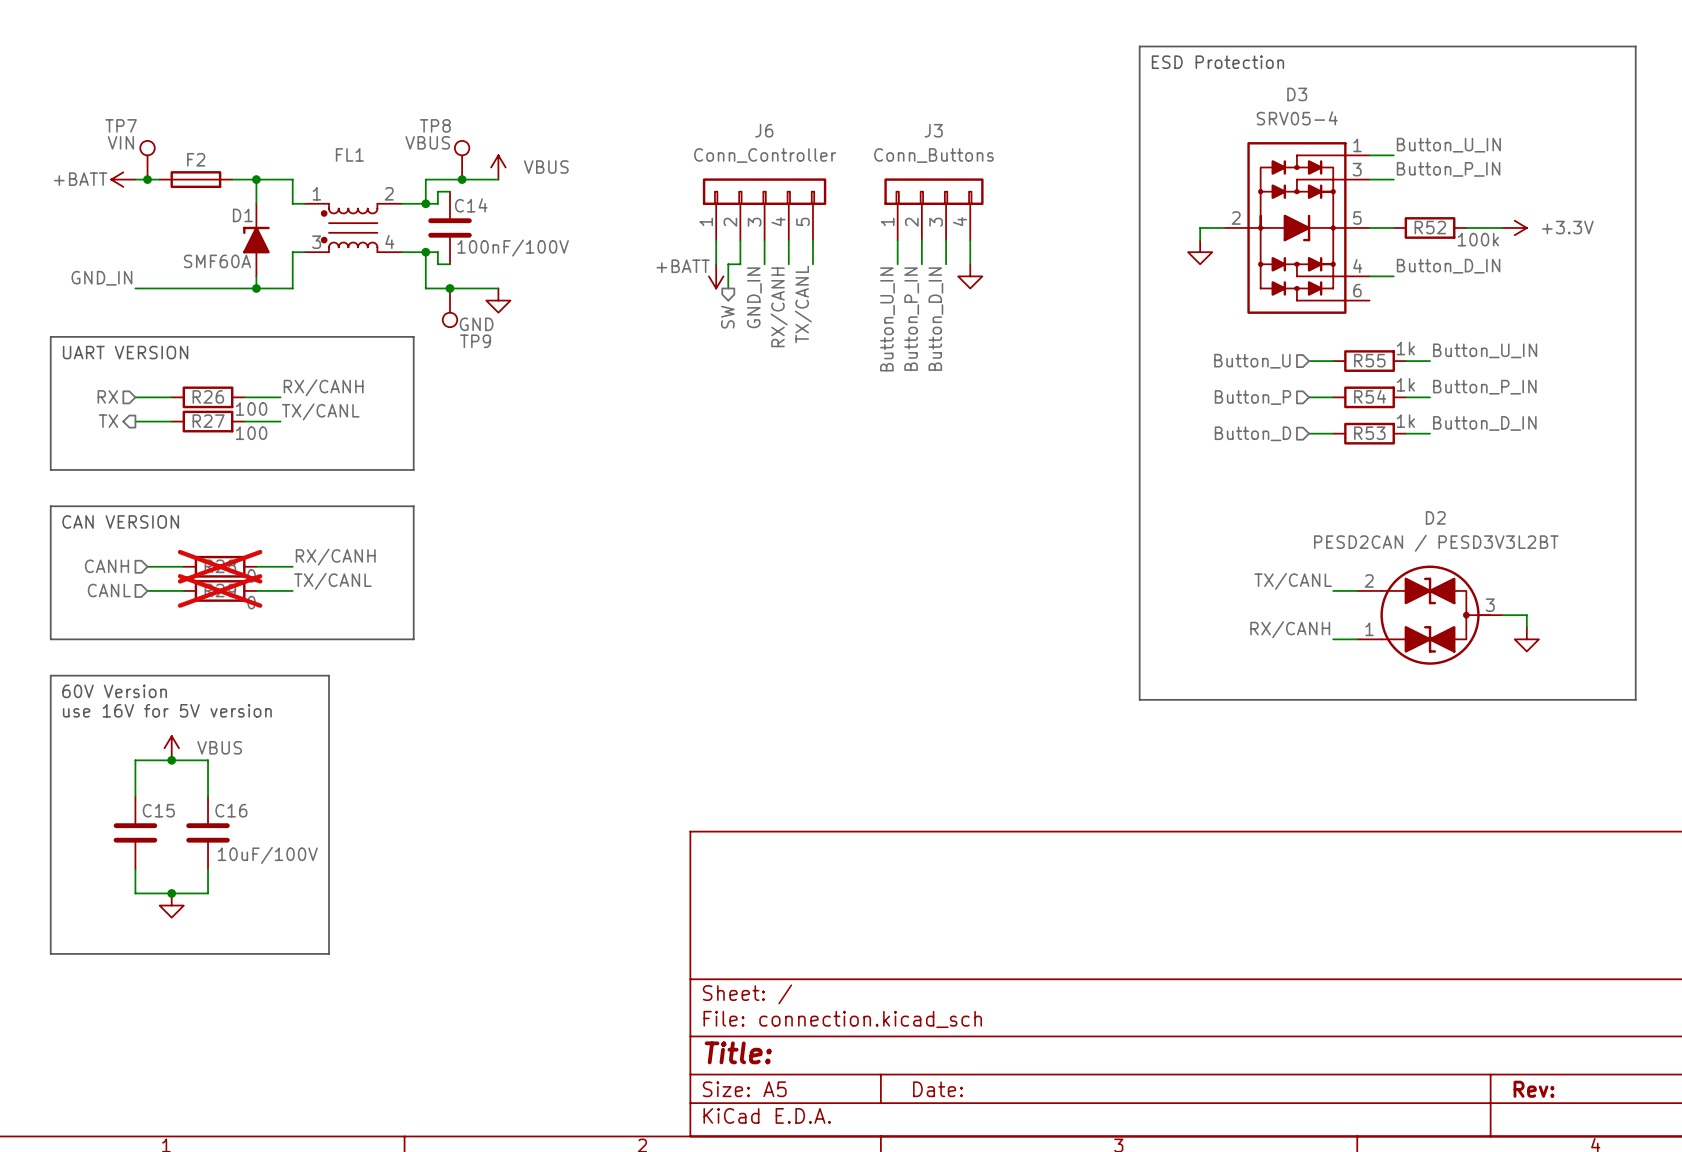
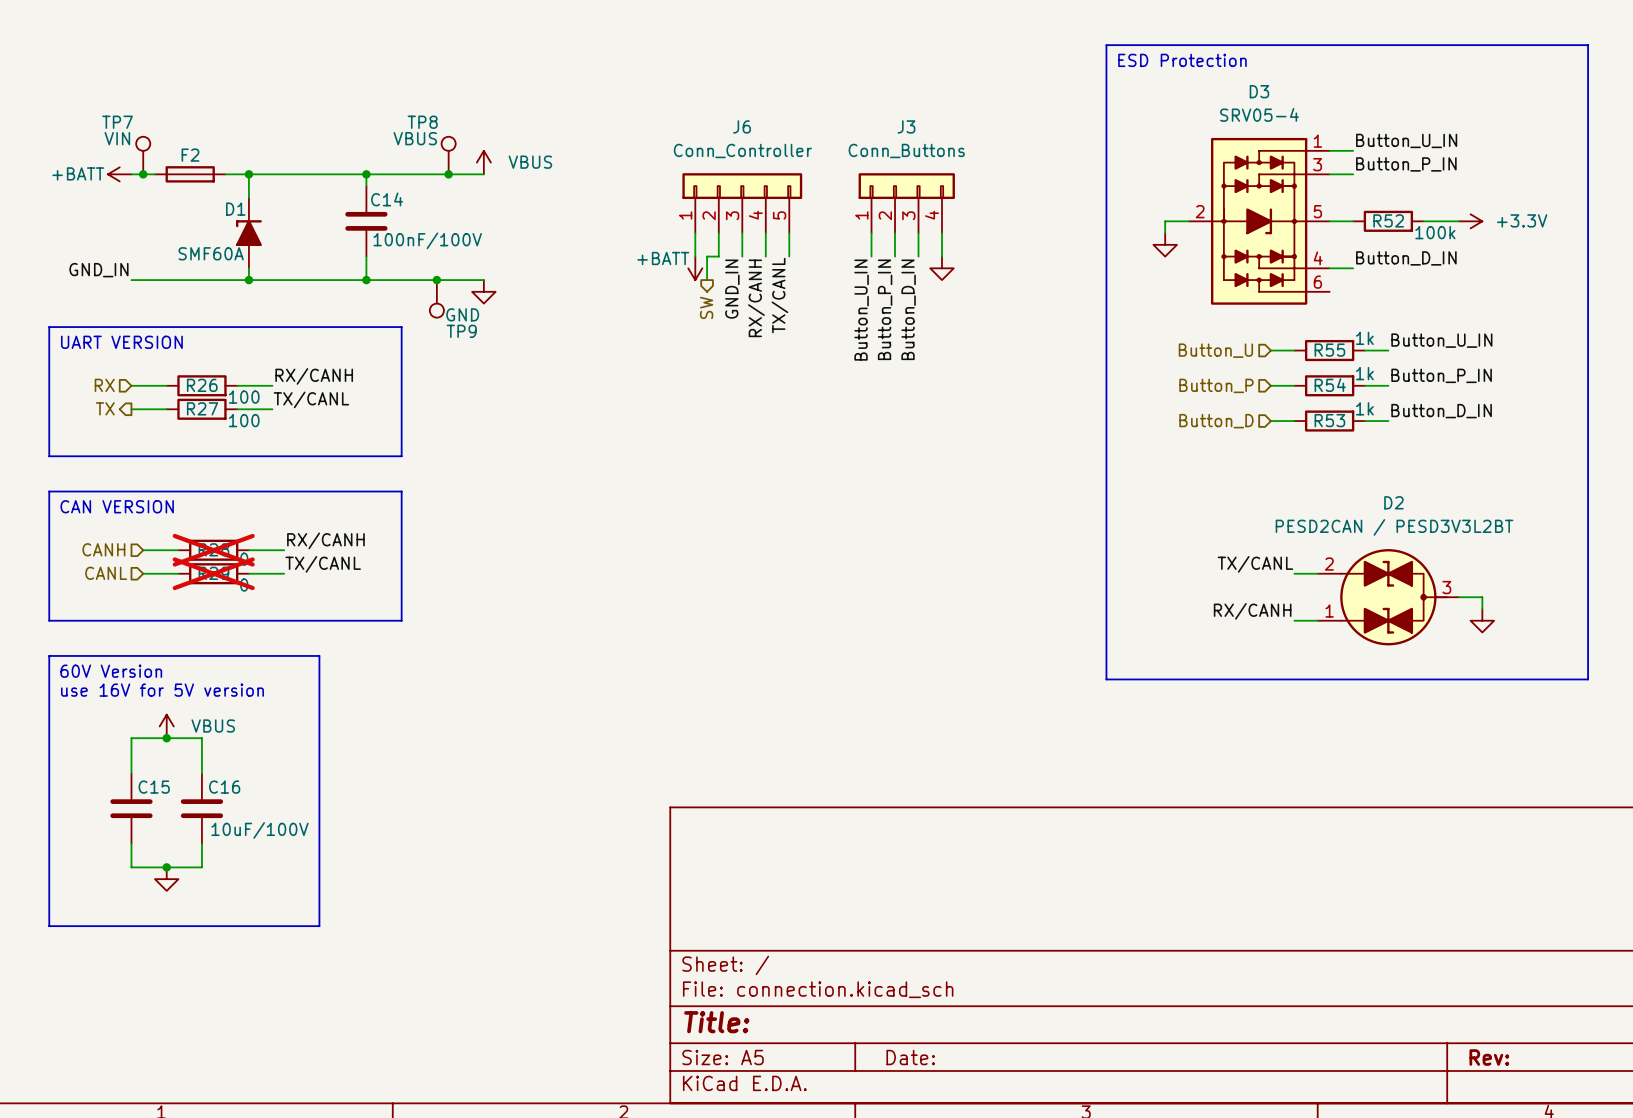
wire: (292, 179) (292, 203) (304, 203) -> (284, 174) (413, 174)
wire: none -> (366, 174) (366, 186)
junction: none -> (366, 174)
wire: (425, 179) (425, 203) -> (366, 256) (366, 280)
wire: (450, 191) (437, 191) (437, 203) (401, 203) -> none
junction: (425, 203) -> none
FL1: (353, 227) -> none
C14 position: (450, 227) -> (366, 221)
wire: (304, 252) (292, 252) (292, 288) -> (413, 280) (284, 280)
wire: (401, 252) (437, 252) (437, 264) (450, 264) -> none
wire: (425, 252) (425, 288) -> none
junction: (425, 252) -> none
junction: none -> (366, 280)

